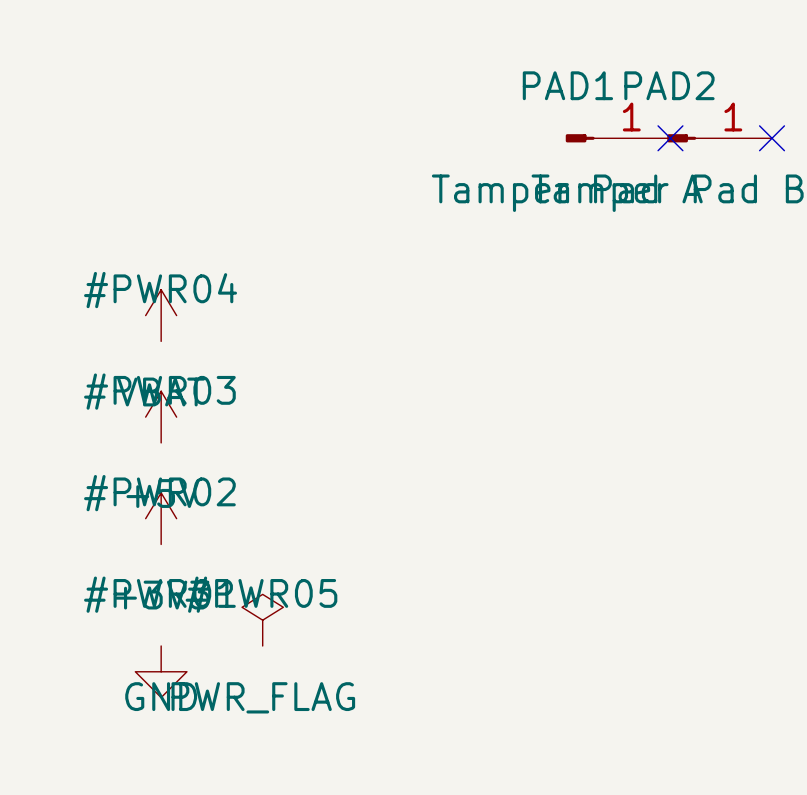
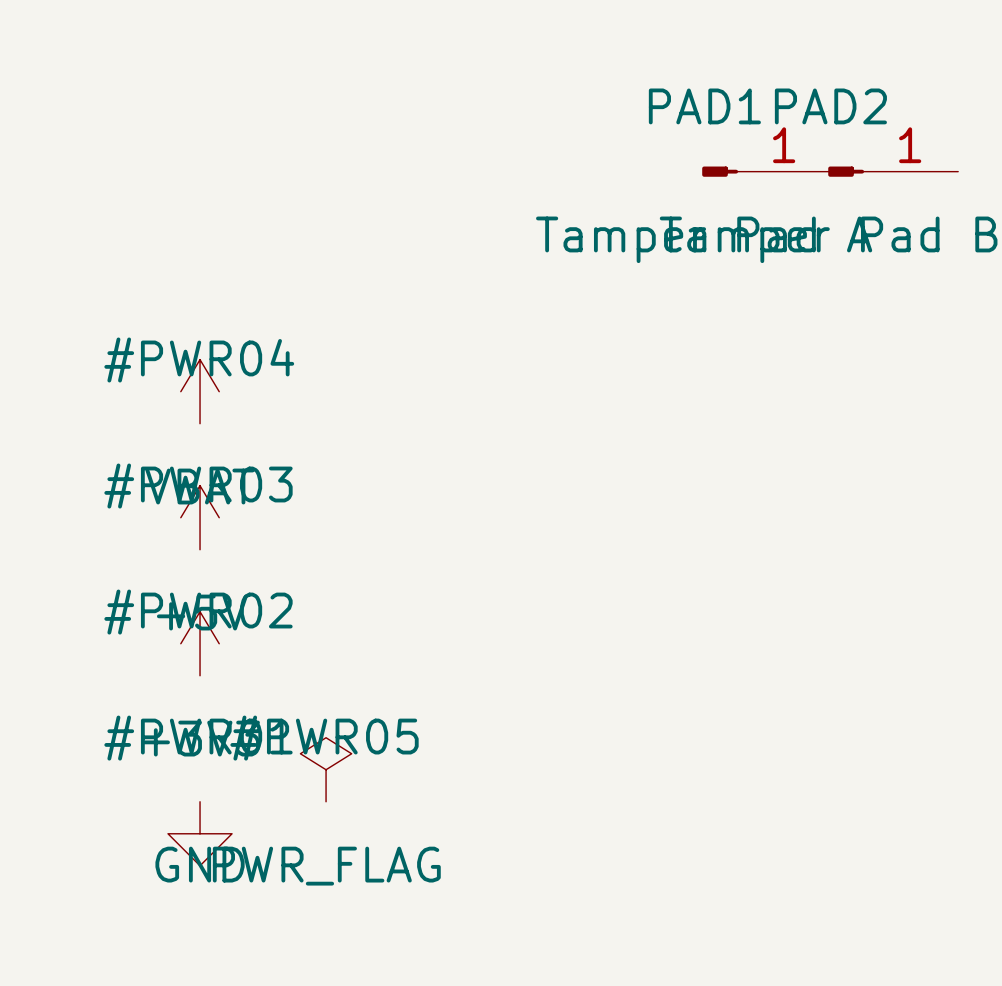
no-connect mark: (670, 138) -> none
no-connect mark: (772, 138) -> none

